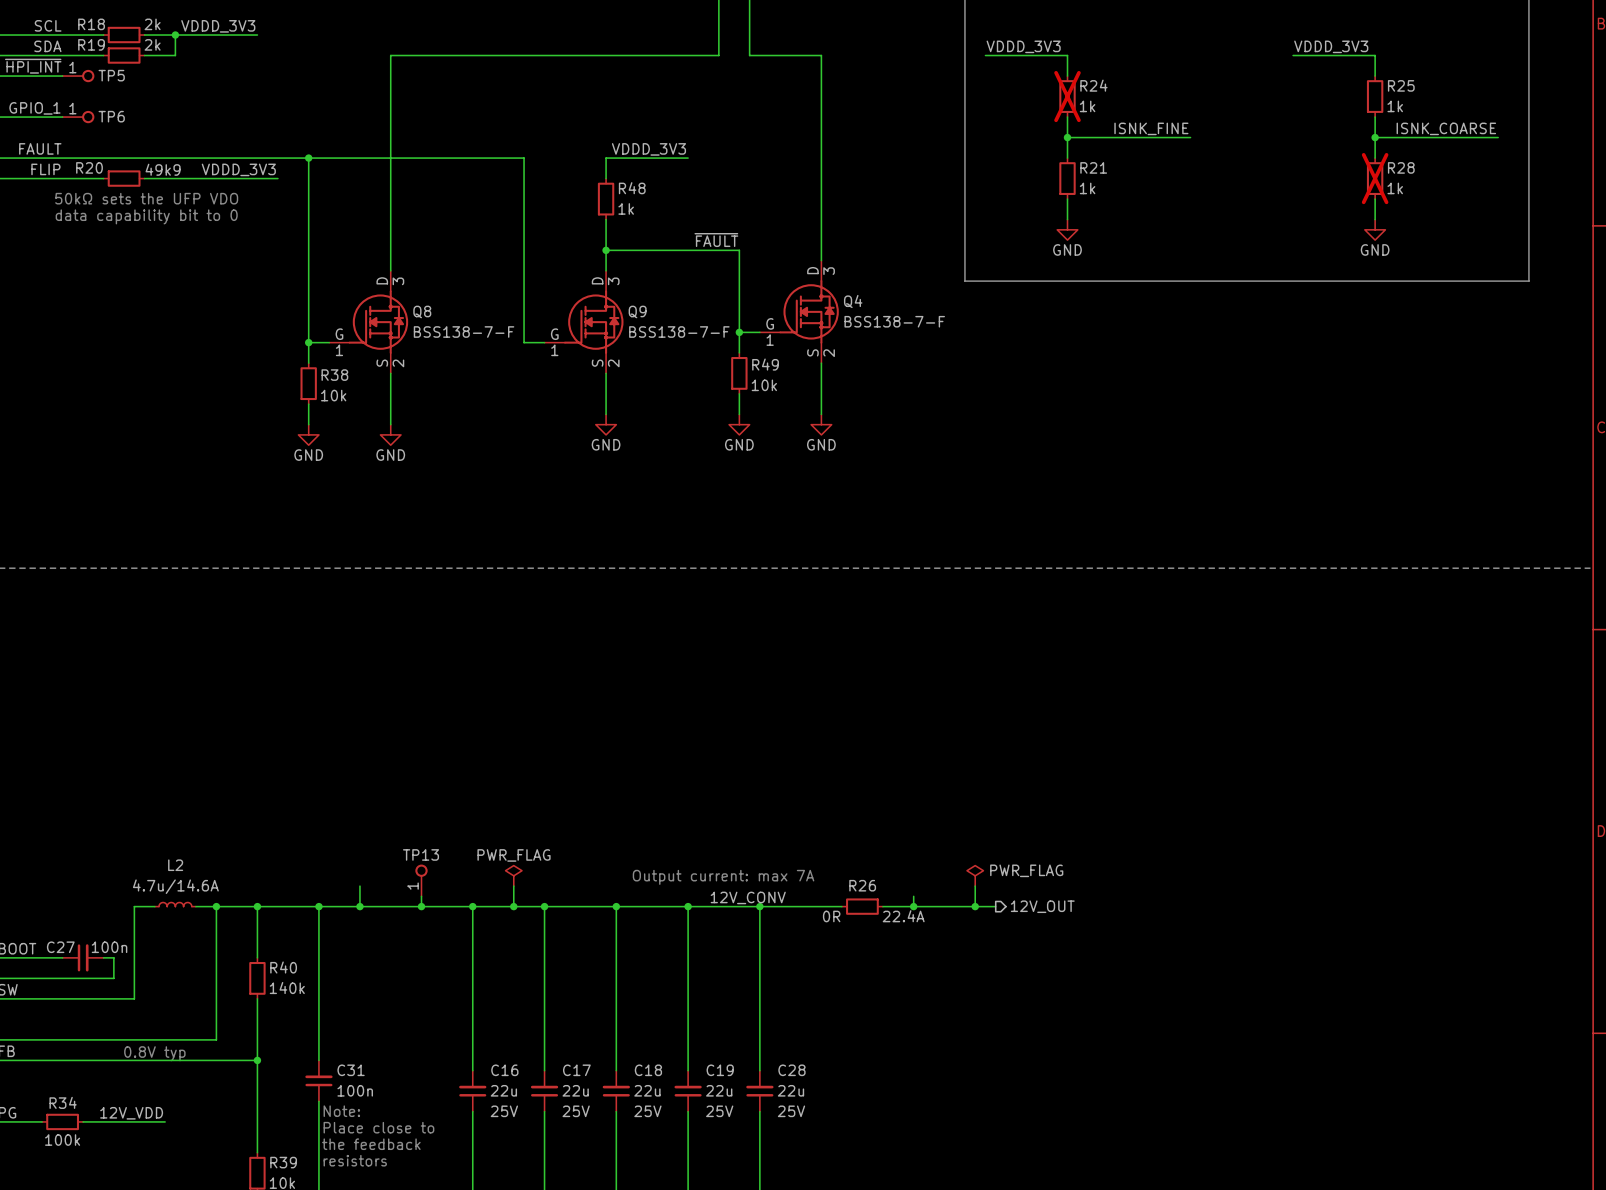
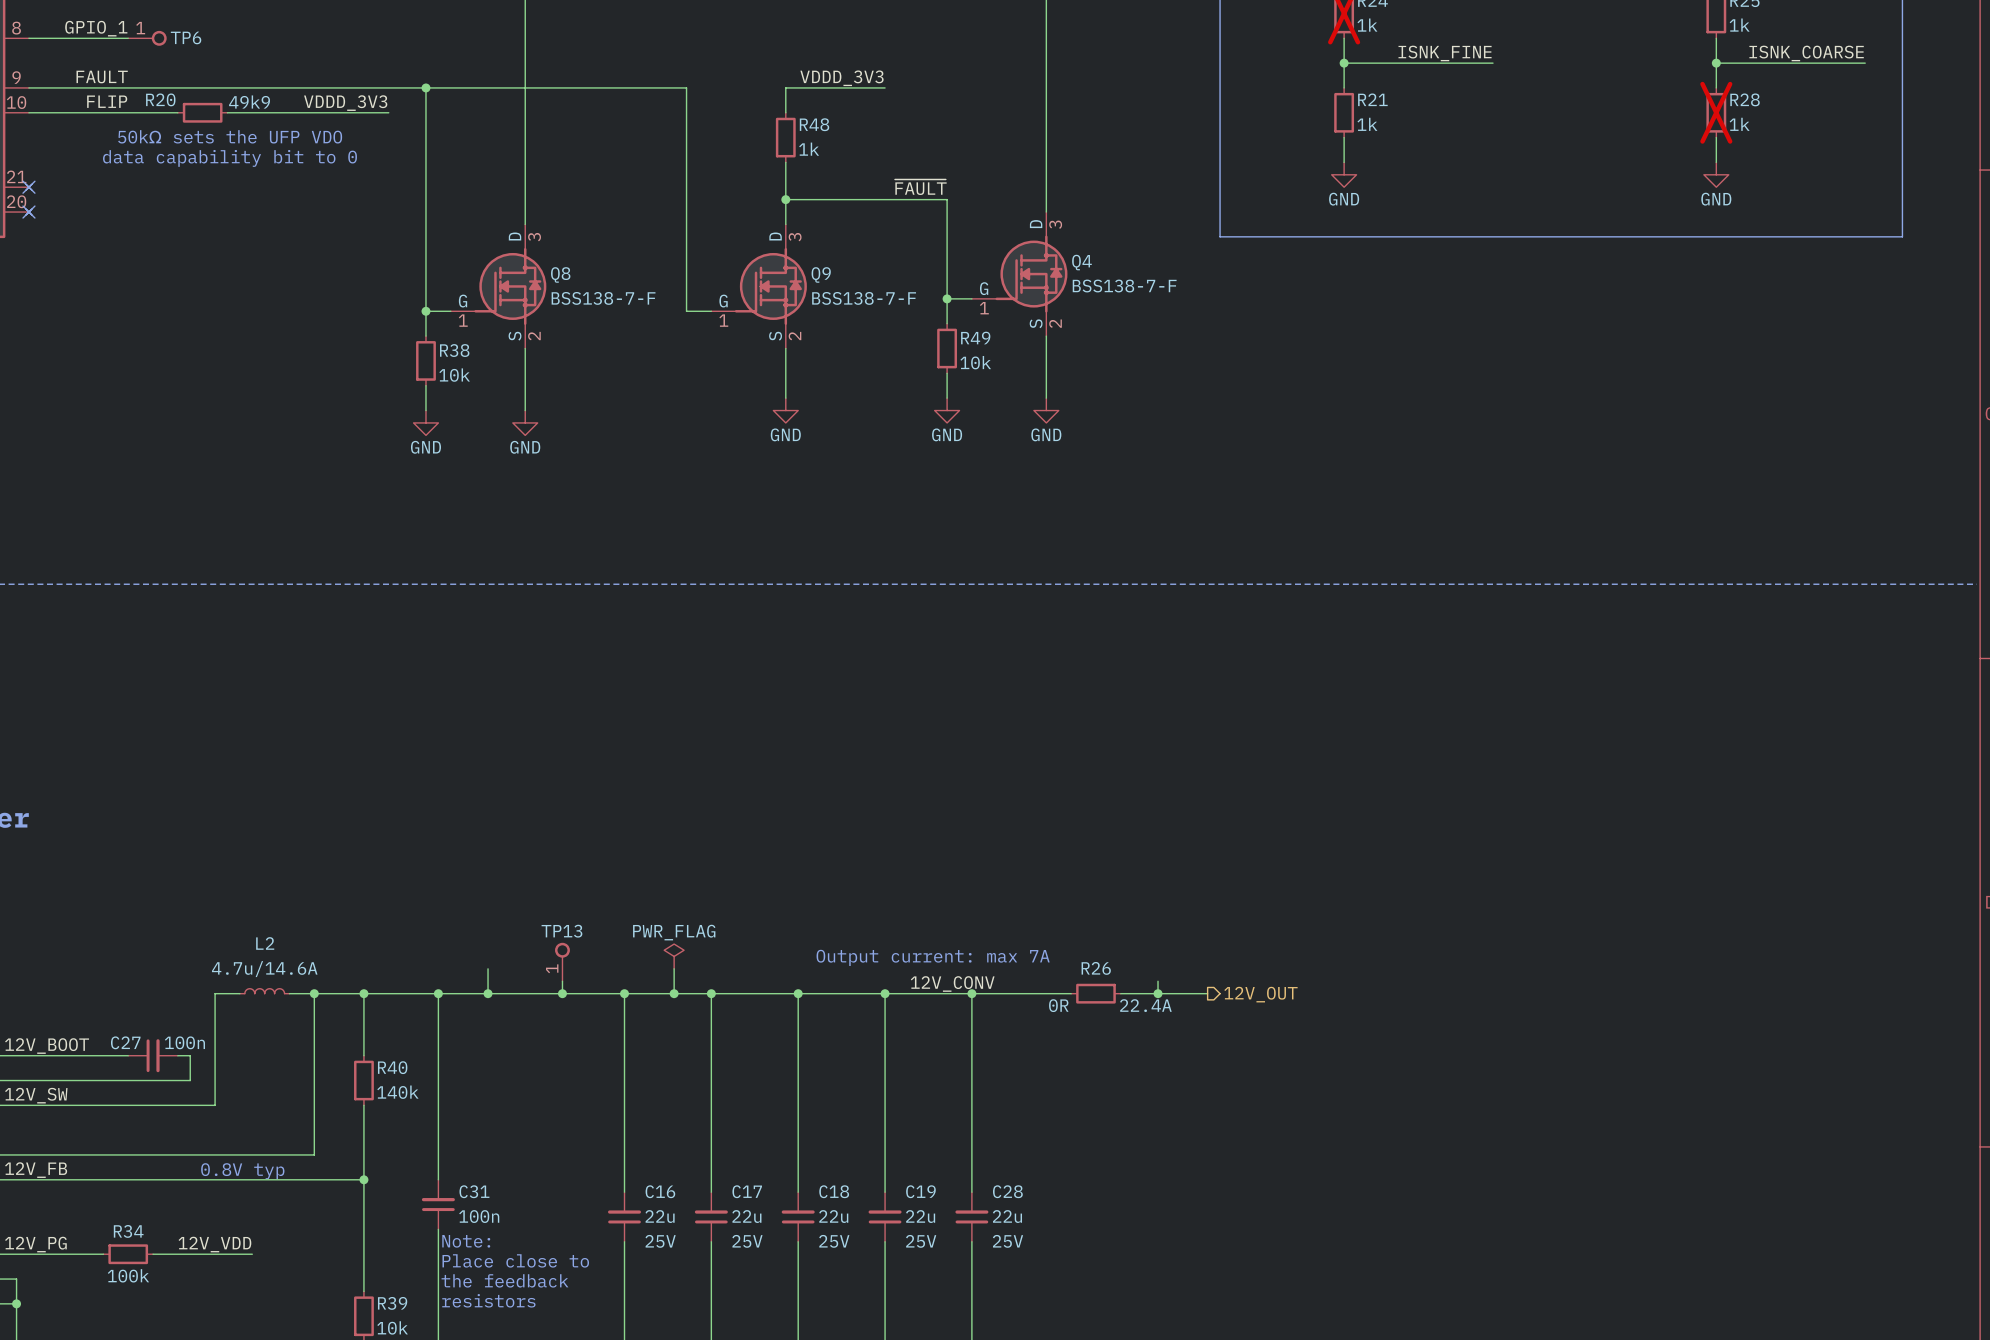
power symbol: PWR_FLAG (975, 875) -> none
wire: (975, 886) (975, 906) -> none
wire: (954, 906) (995, 906) -> none
junction: (975, 906) -> none
hierarchical label position: 12V_OUT (1042, 906) -> 12V_OUT (1260, 994)

